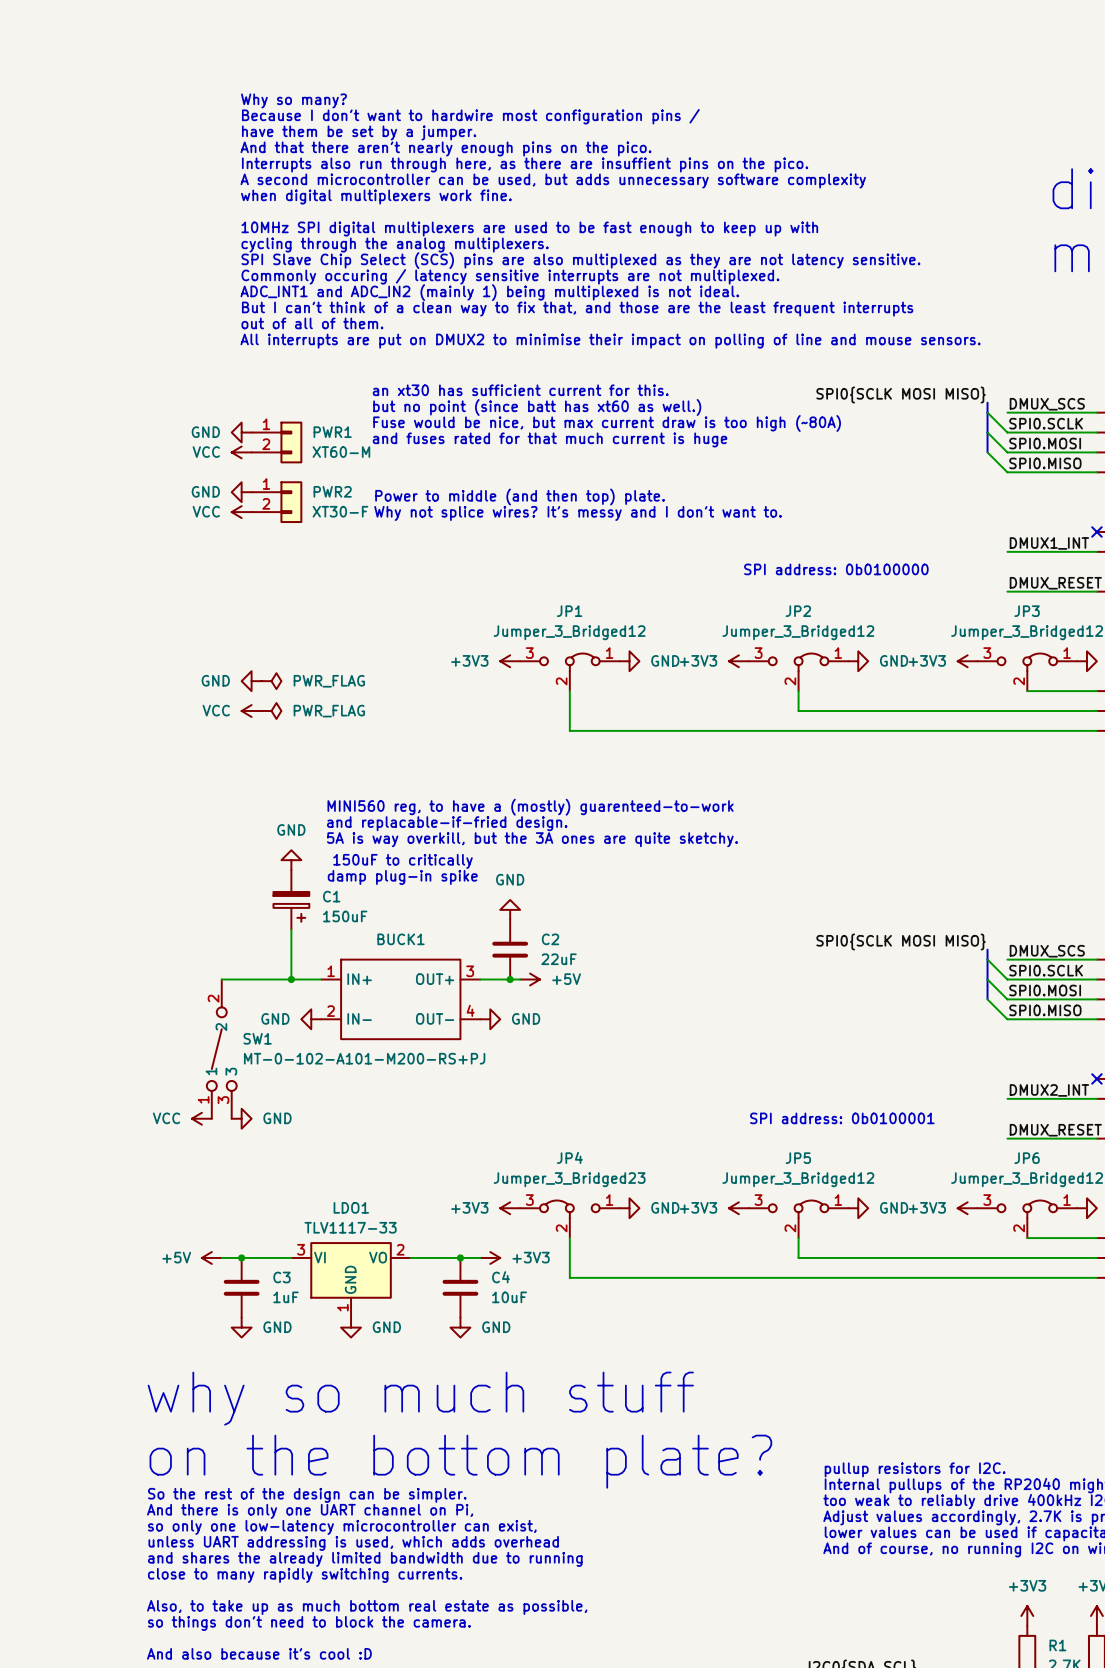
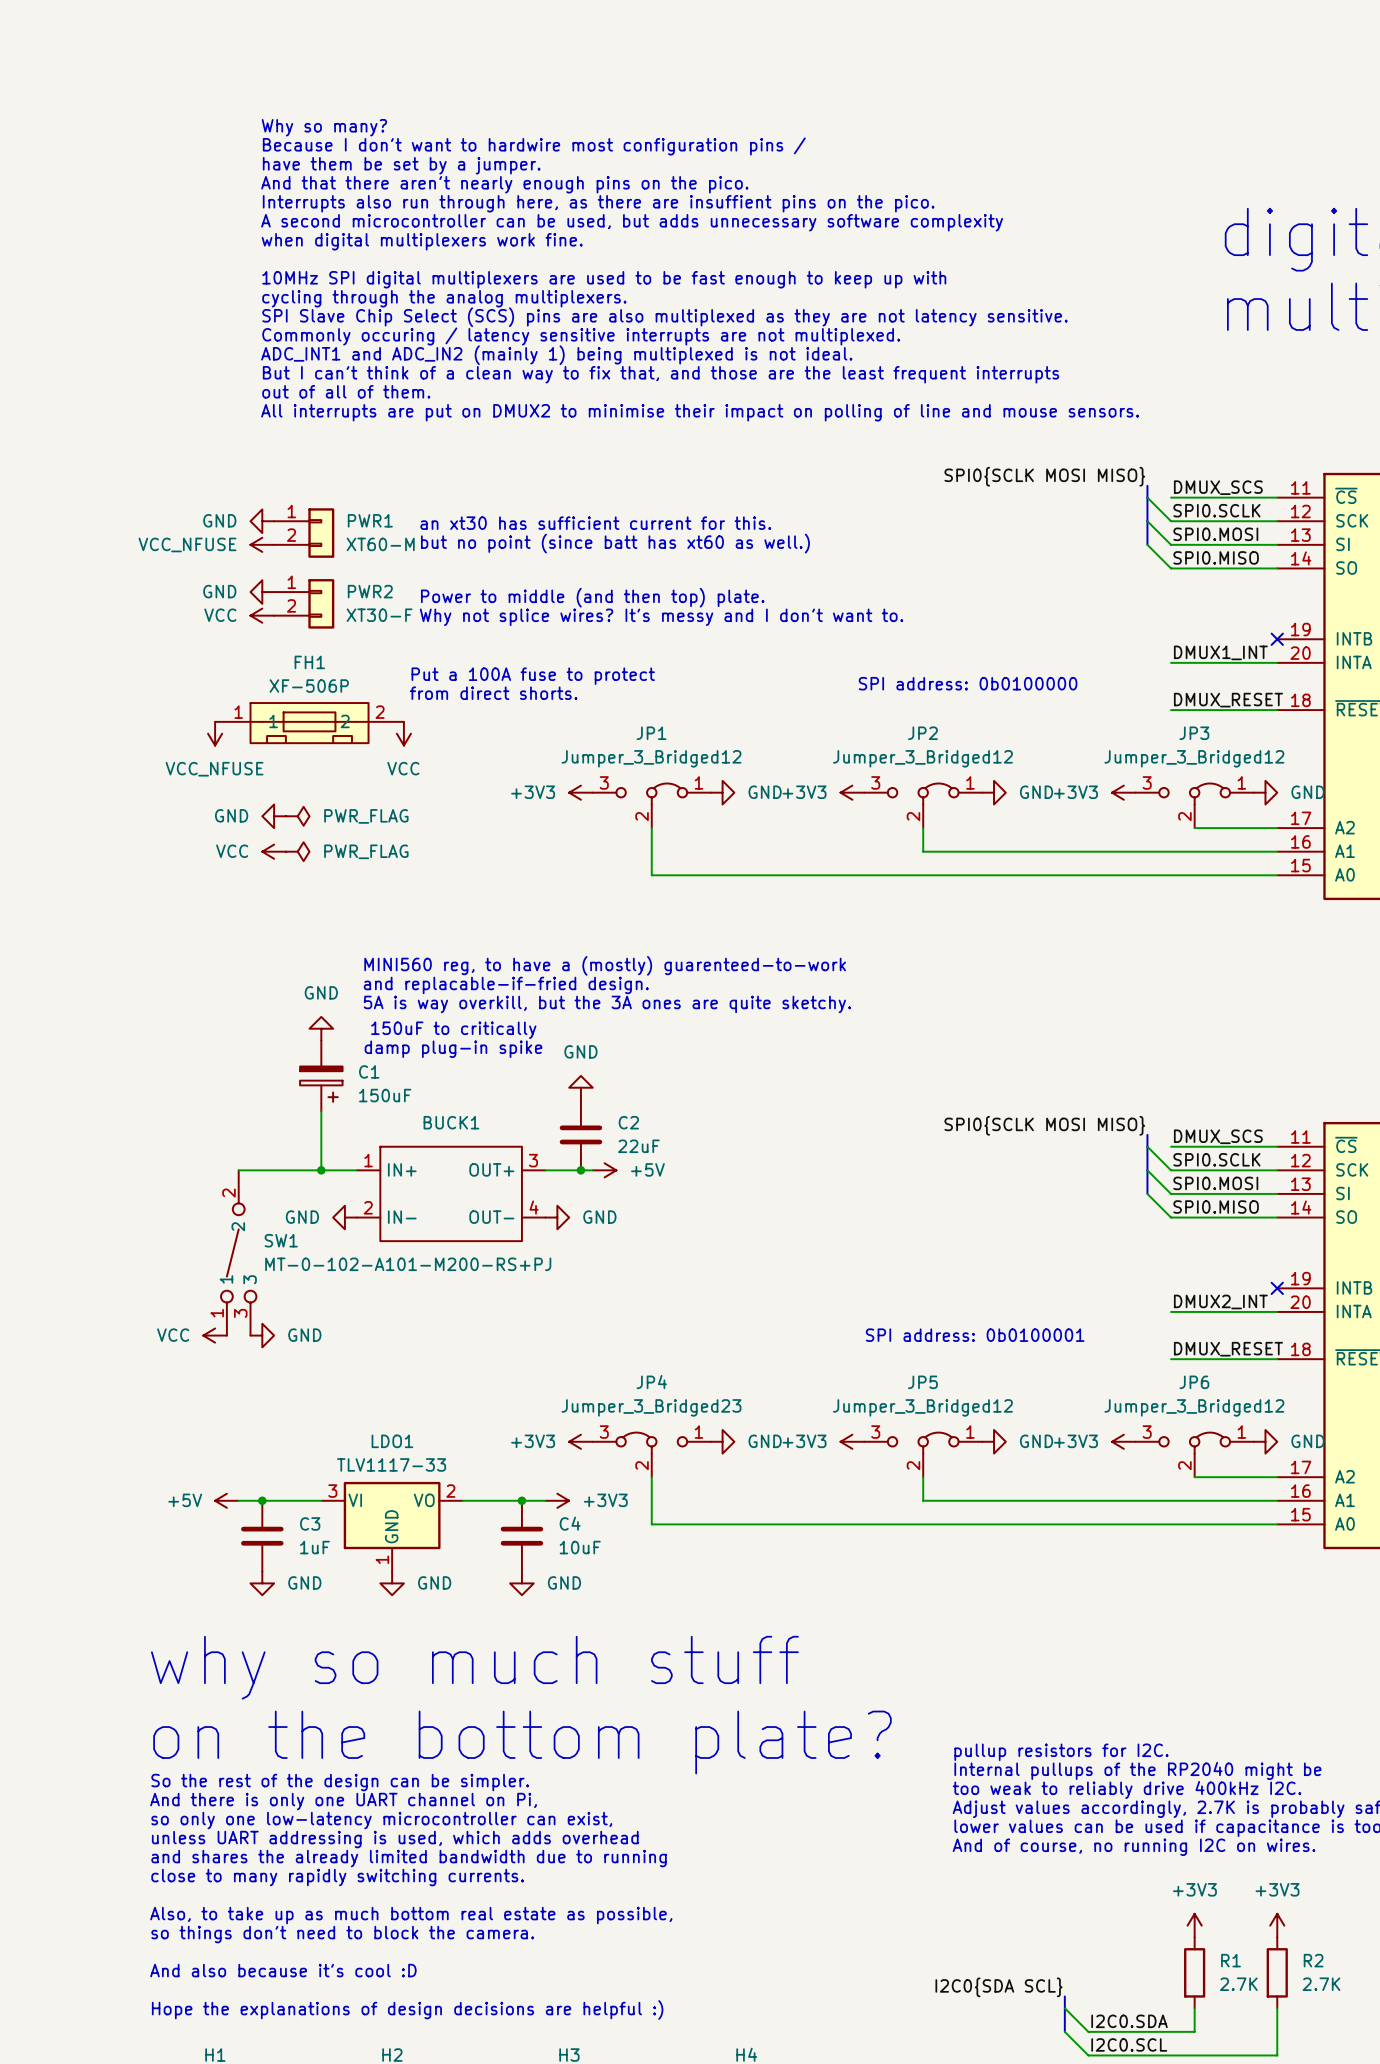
text: an xt30 has sufficient current for this. (520, 390) -> none
text position: but no point (since batt has xt60 as well.) (537, 407) -> but no point (since batt has xt60 as well.) (615, 543)
text: Fuse would be nice, but max current draw is too high (~80A) (607, 423) -> none
text: and fuses rated for that much current is huge (550, 439) -> an xt30 has sufficient current for this. (595, 523)
power symbol: VCC (241, 452) -> VCC_NFUSE (262, 544)
text: none -> Put a 100A fuse to protect (533, 676)
text: none -> from direct shorts. (493, 693)
FH1: none -> XF-506P (309, 723)
power symbol: none -> VCC_NFUSE (215, 733)
power symbol: none -> VCC (403, 733)

